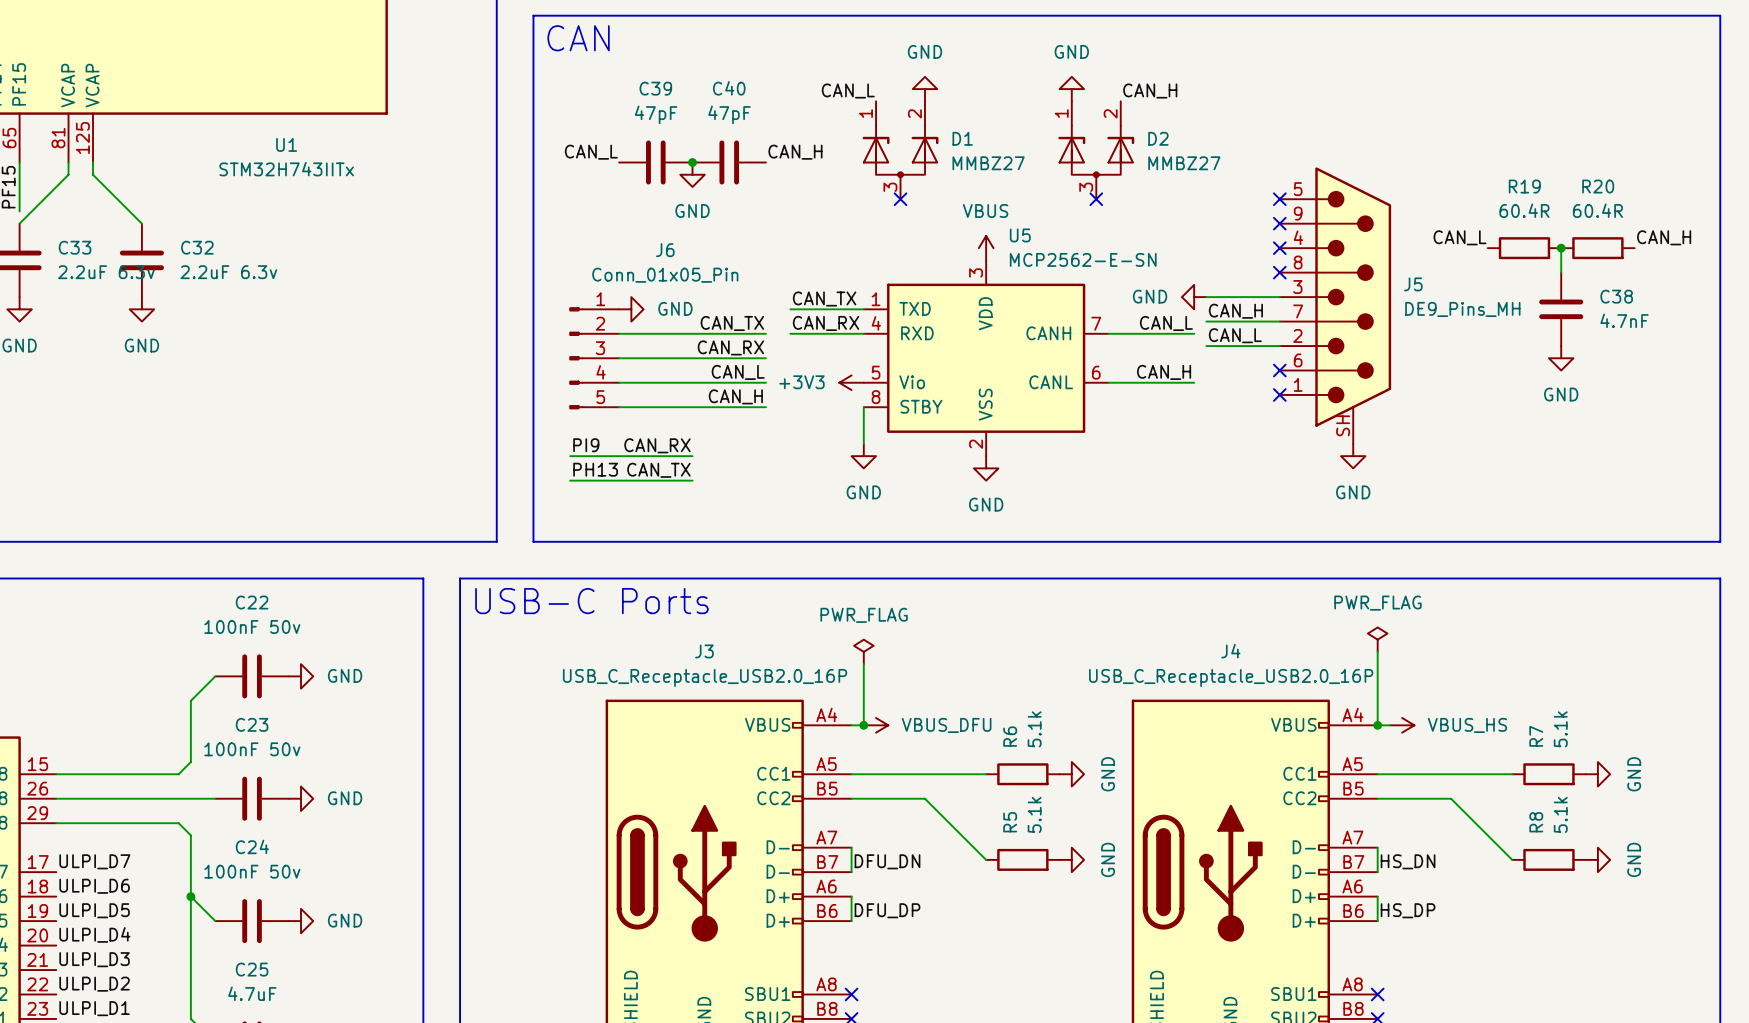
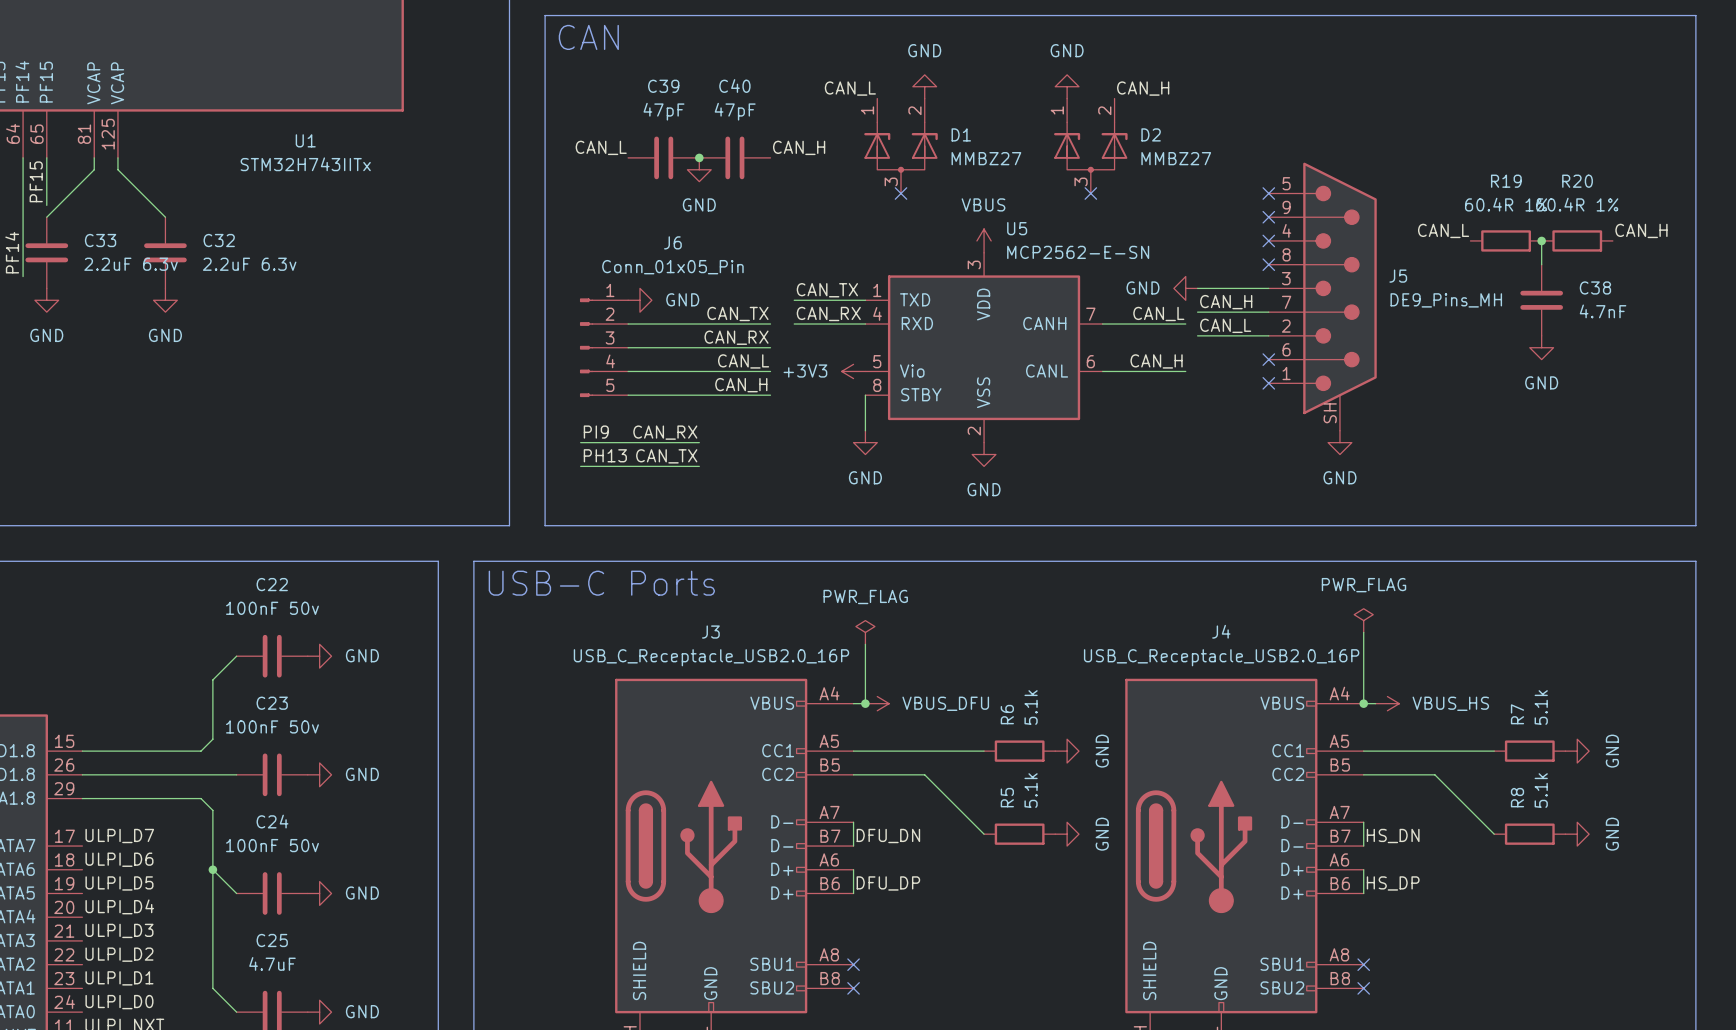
R19 value: 60.4R (1524, 210) -> 60.4R 1% (1506, 204)
R20 value: 60.4R (1597, 210) -> 60.4R 1% (1577, 204)

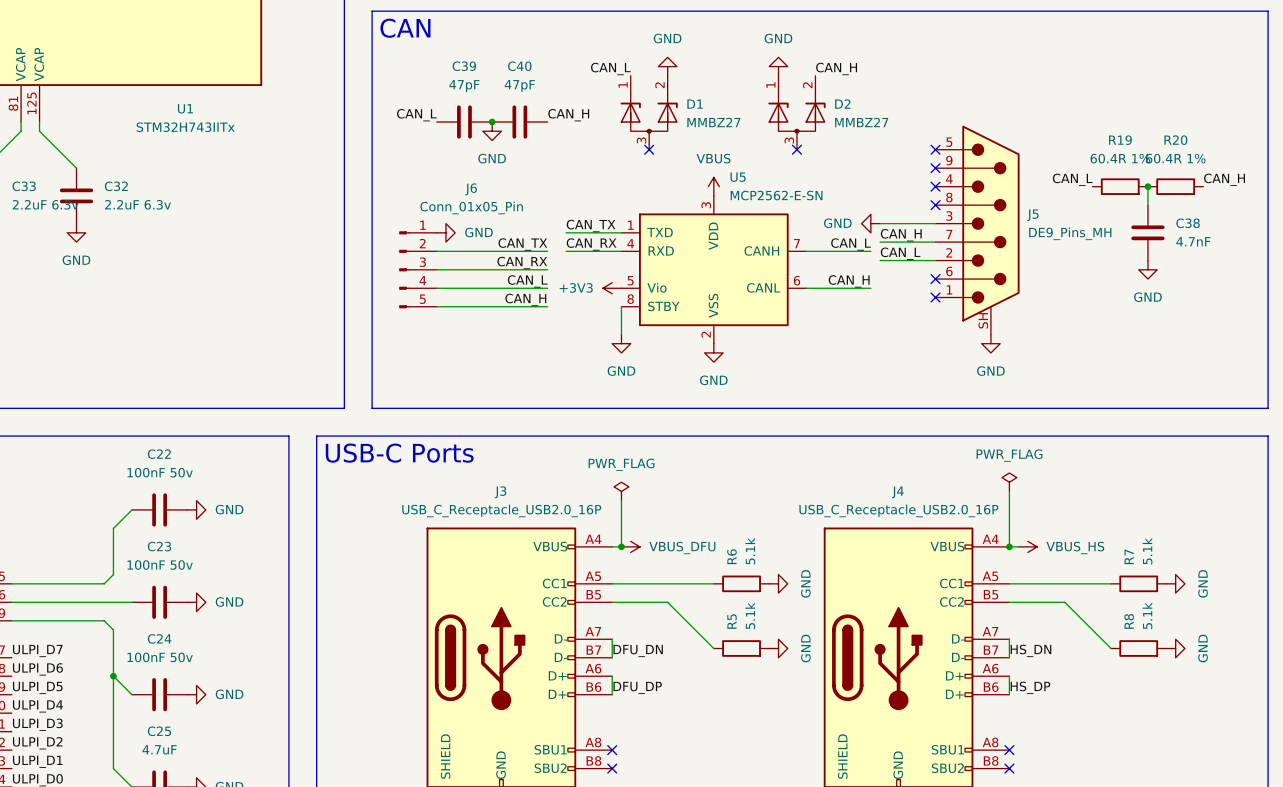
label: PI9 (596, 432) -> none
label: CAN_RX (665, 432) -> none
wire: (580, 442) (699, 442) -> none
label: PH13 (605, 455) -> none
label: CAN_TX (666, 456) -> none
wire: (580, 466) (699, 466) -> none

